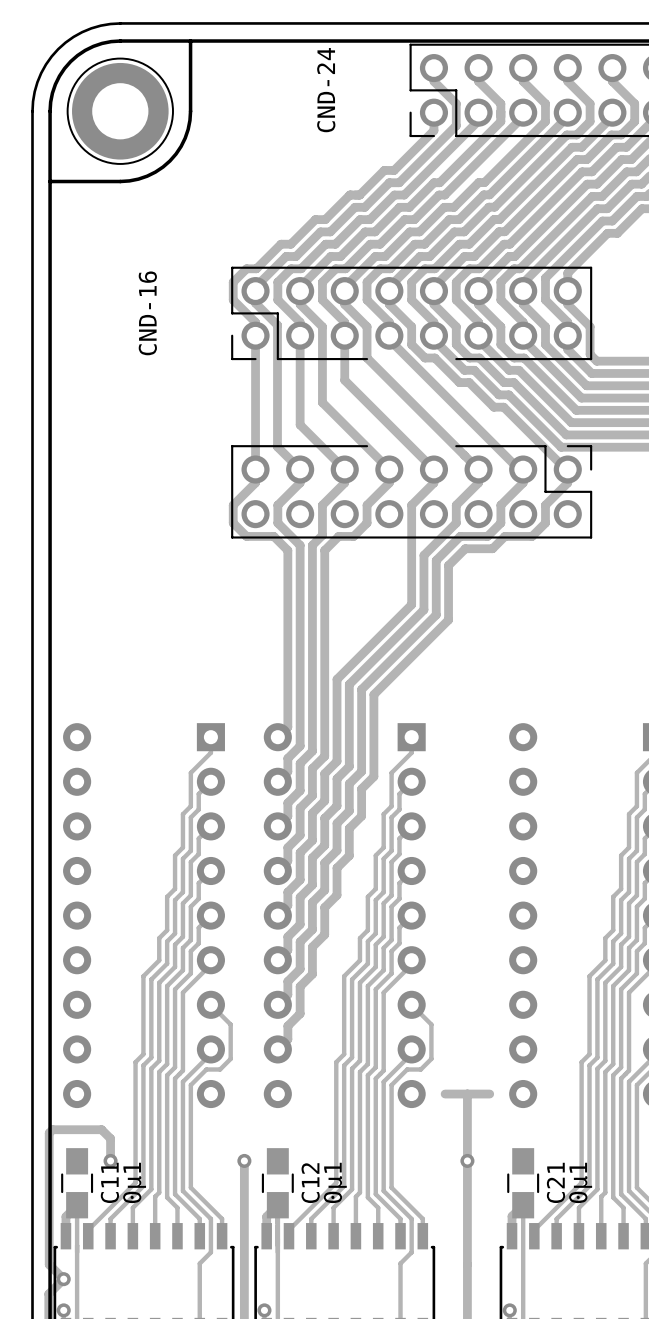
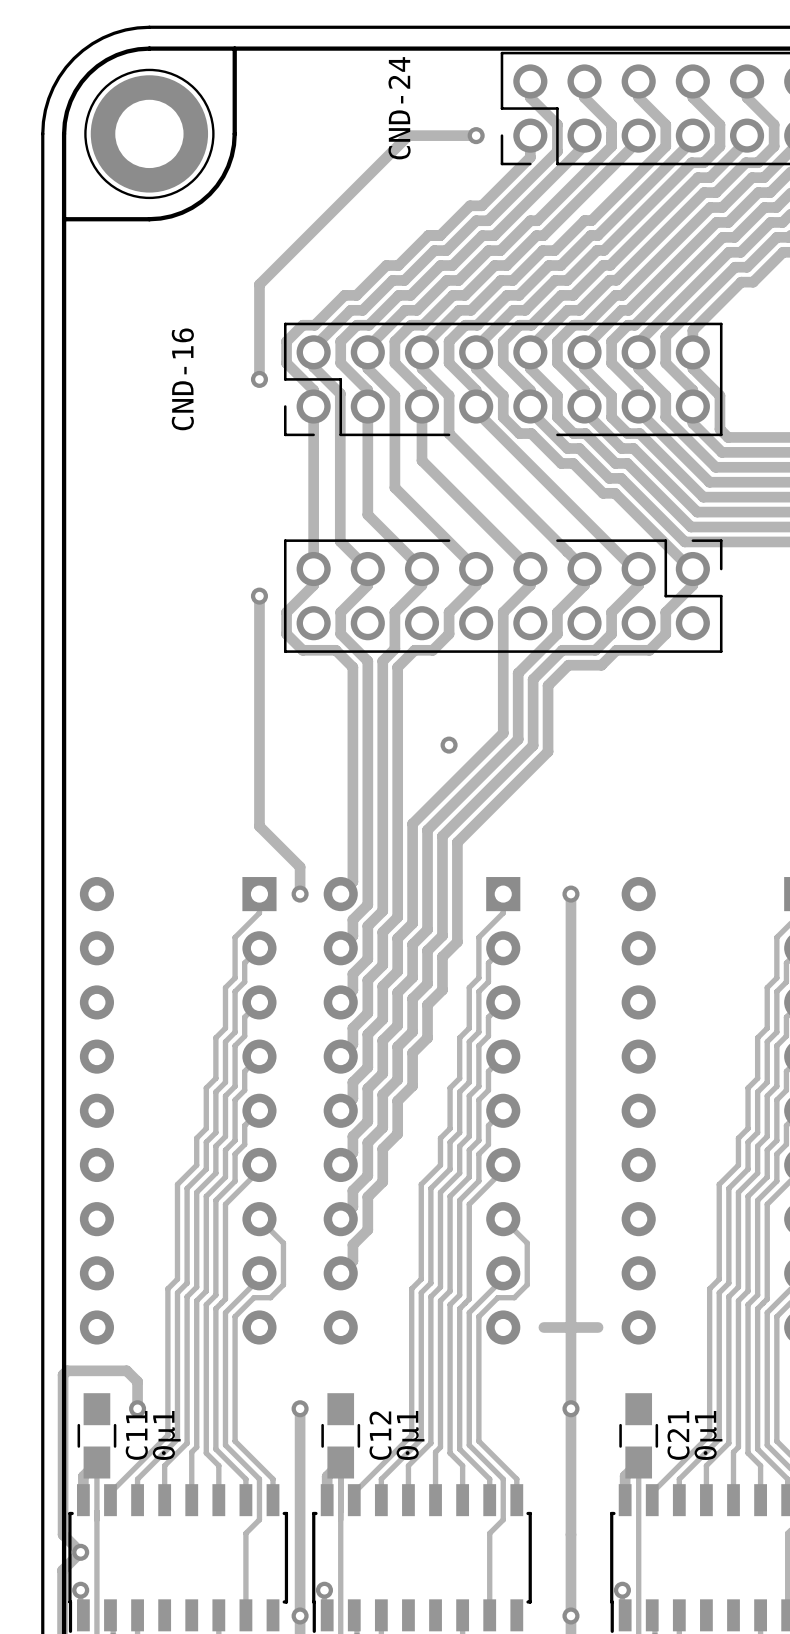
track: none -> (476, 135) (408, 135) (259, 284) (259, 379)
via: none -> (476, 135)
via: none -> (259, 379)
track: none -> (259, 596) (259, 826) (300, 867) (300, 894)
via: none -> (259, 596)
via: none -> (449, 745)
via: none -> (300, 894)
track: none -> (570, 894) (570, 1327)
via: none -> (570, 894)

